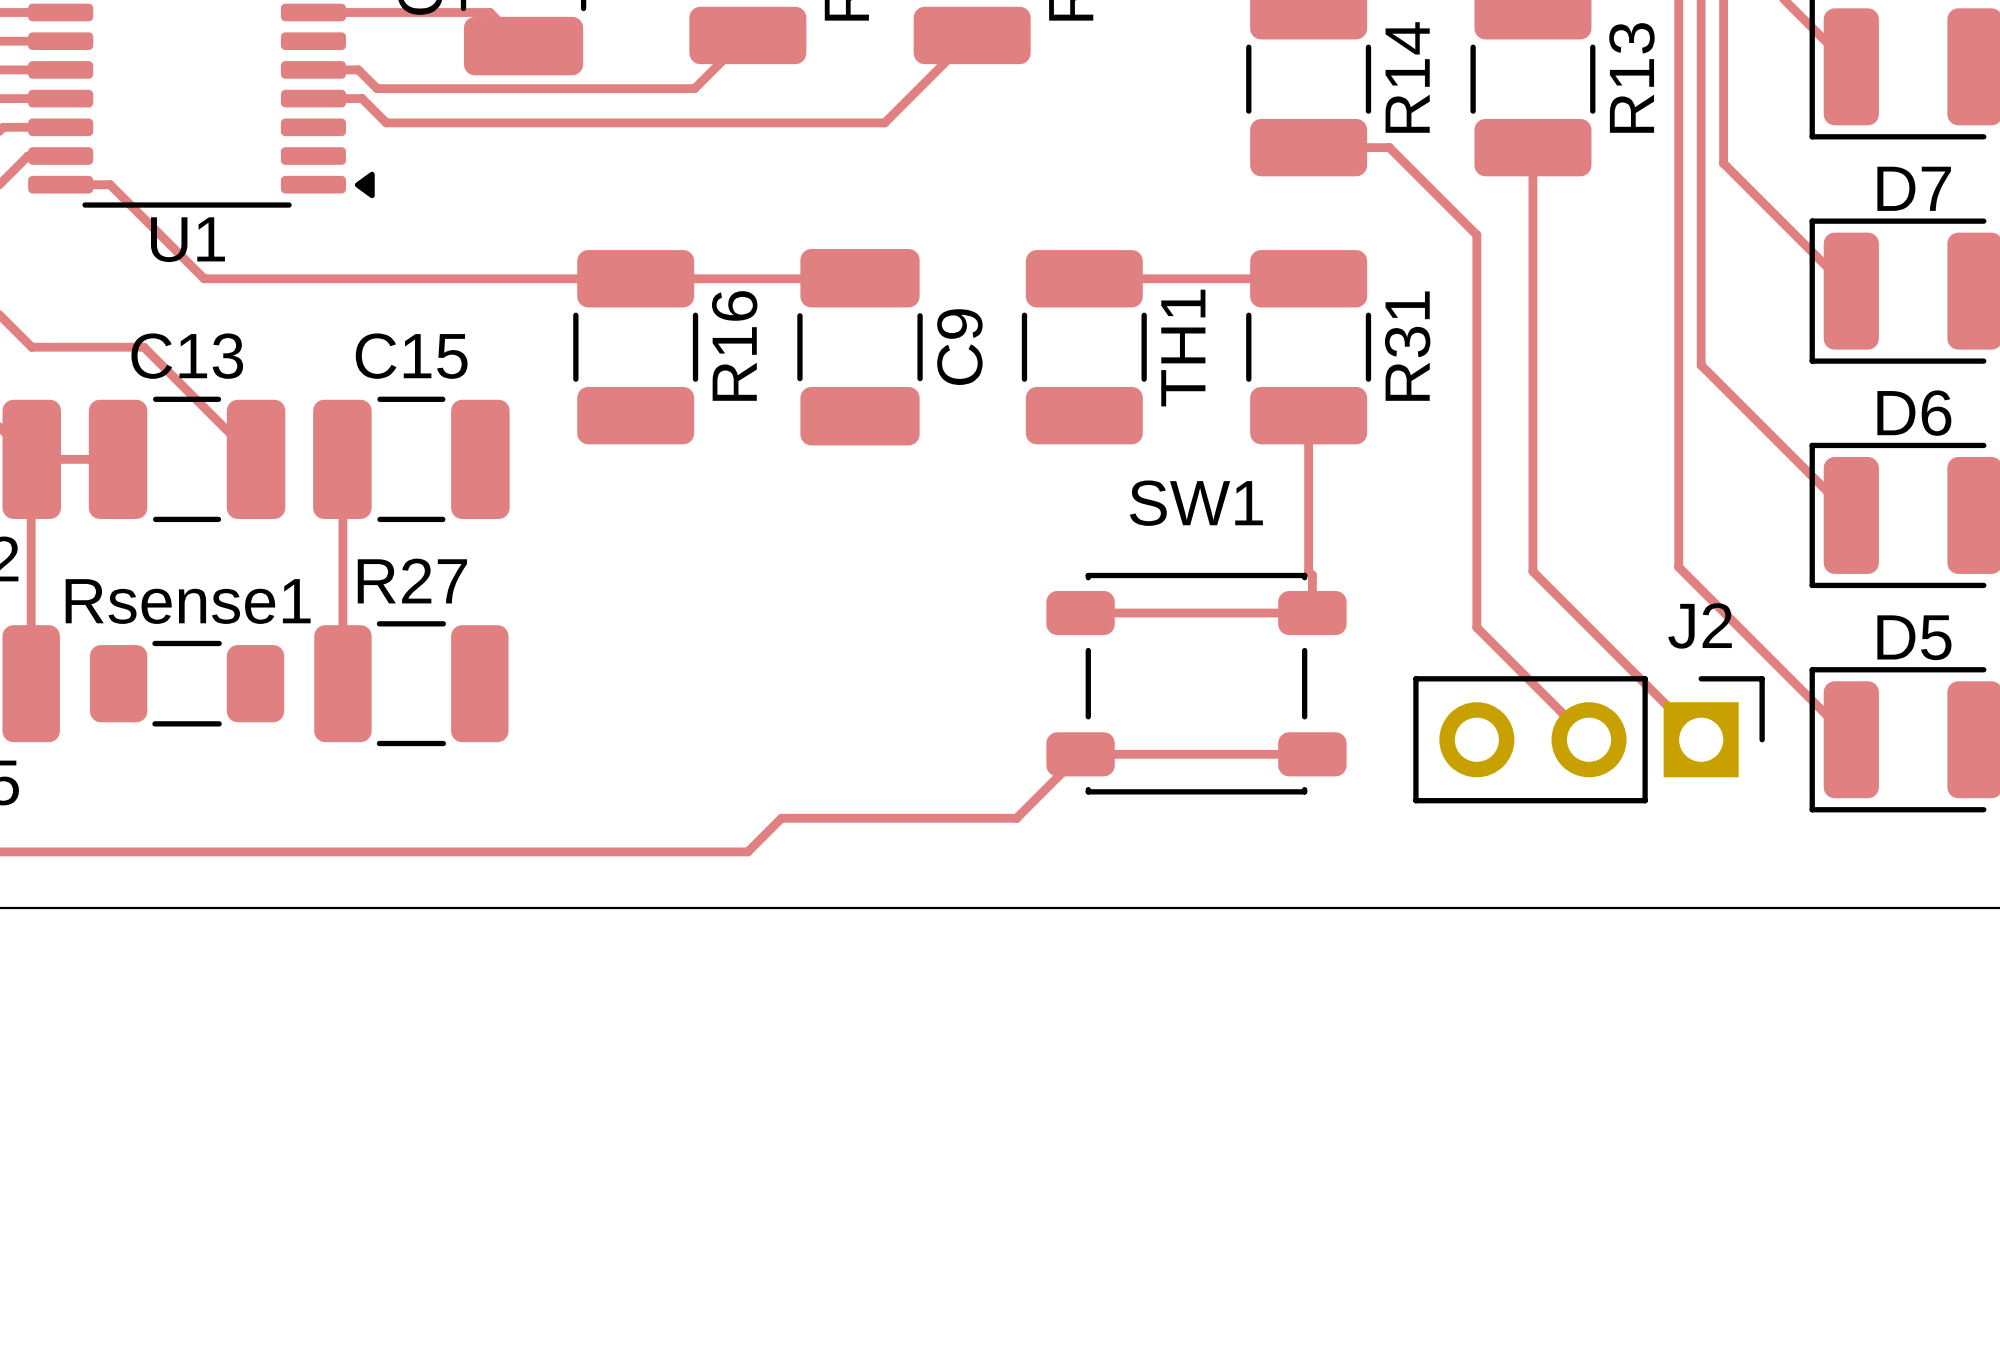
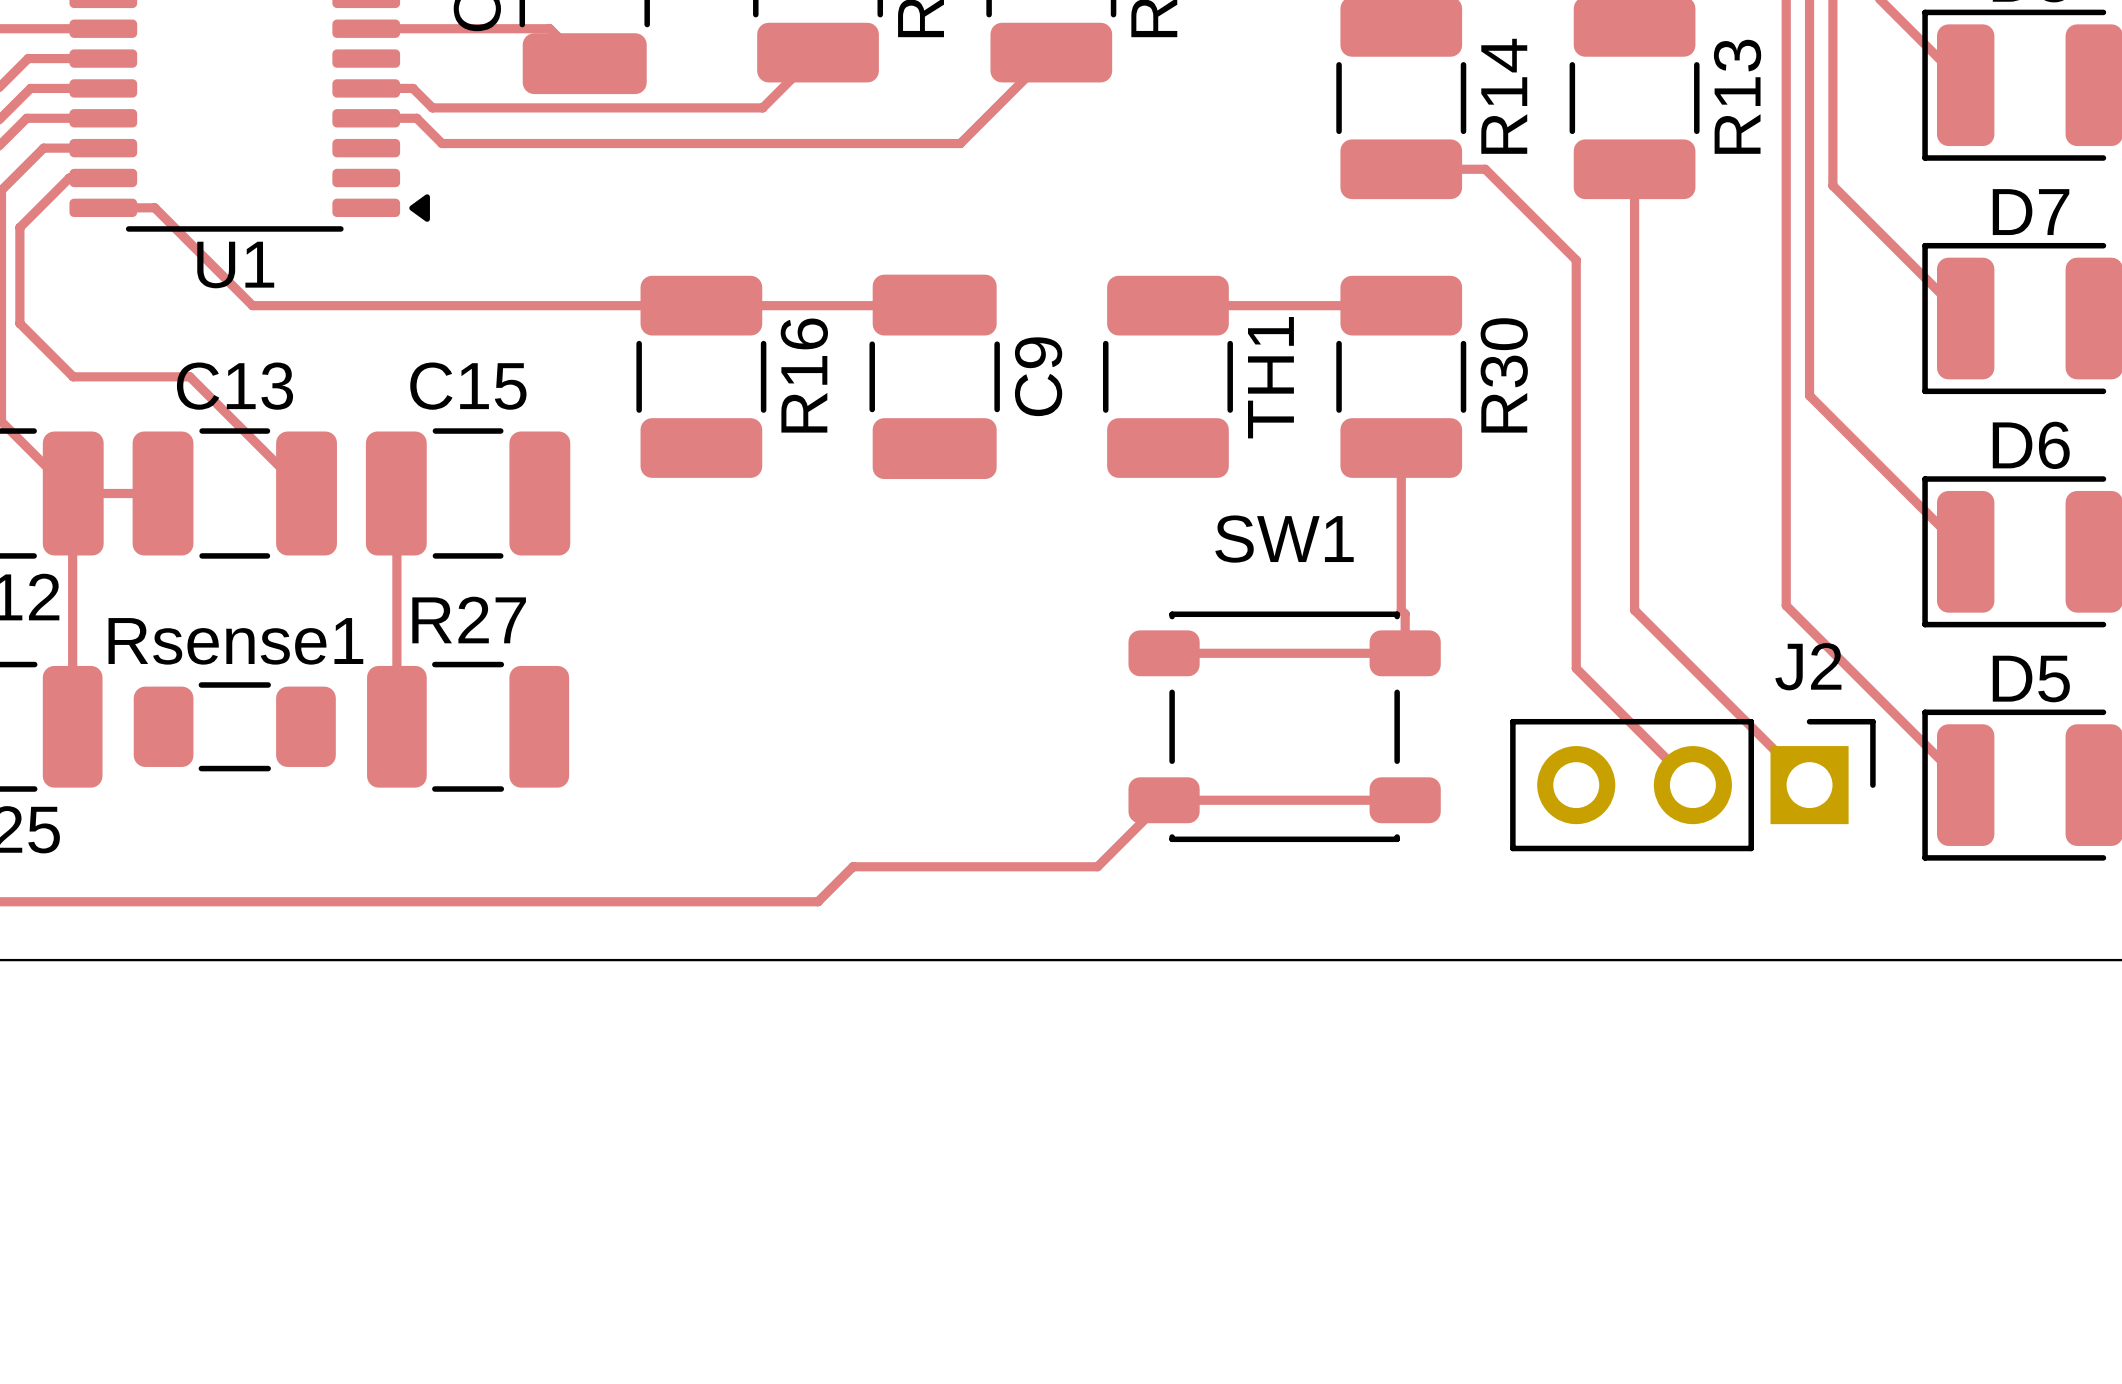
R31 name: R31 (1407, 346) -> R30 (1504, 375)

